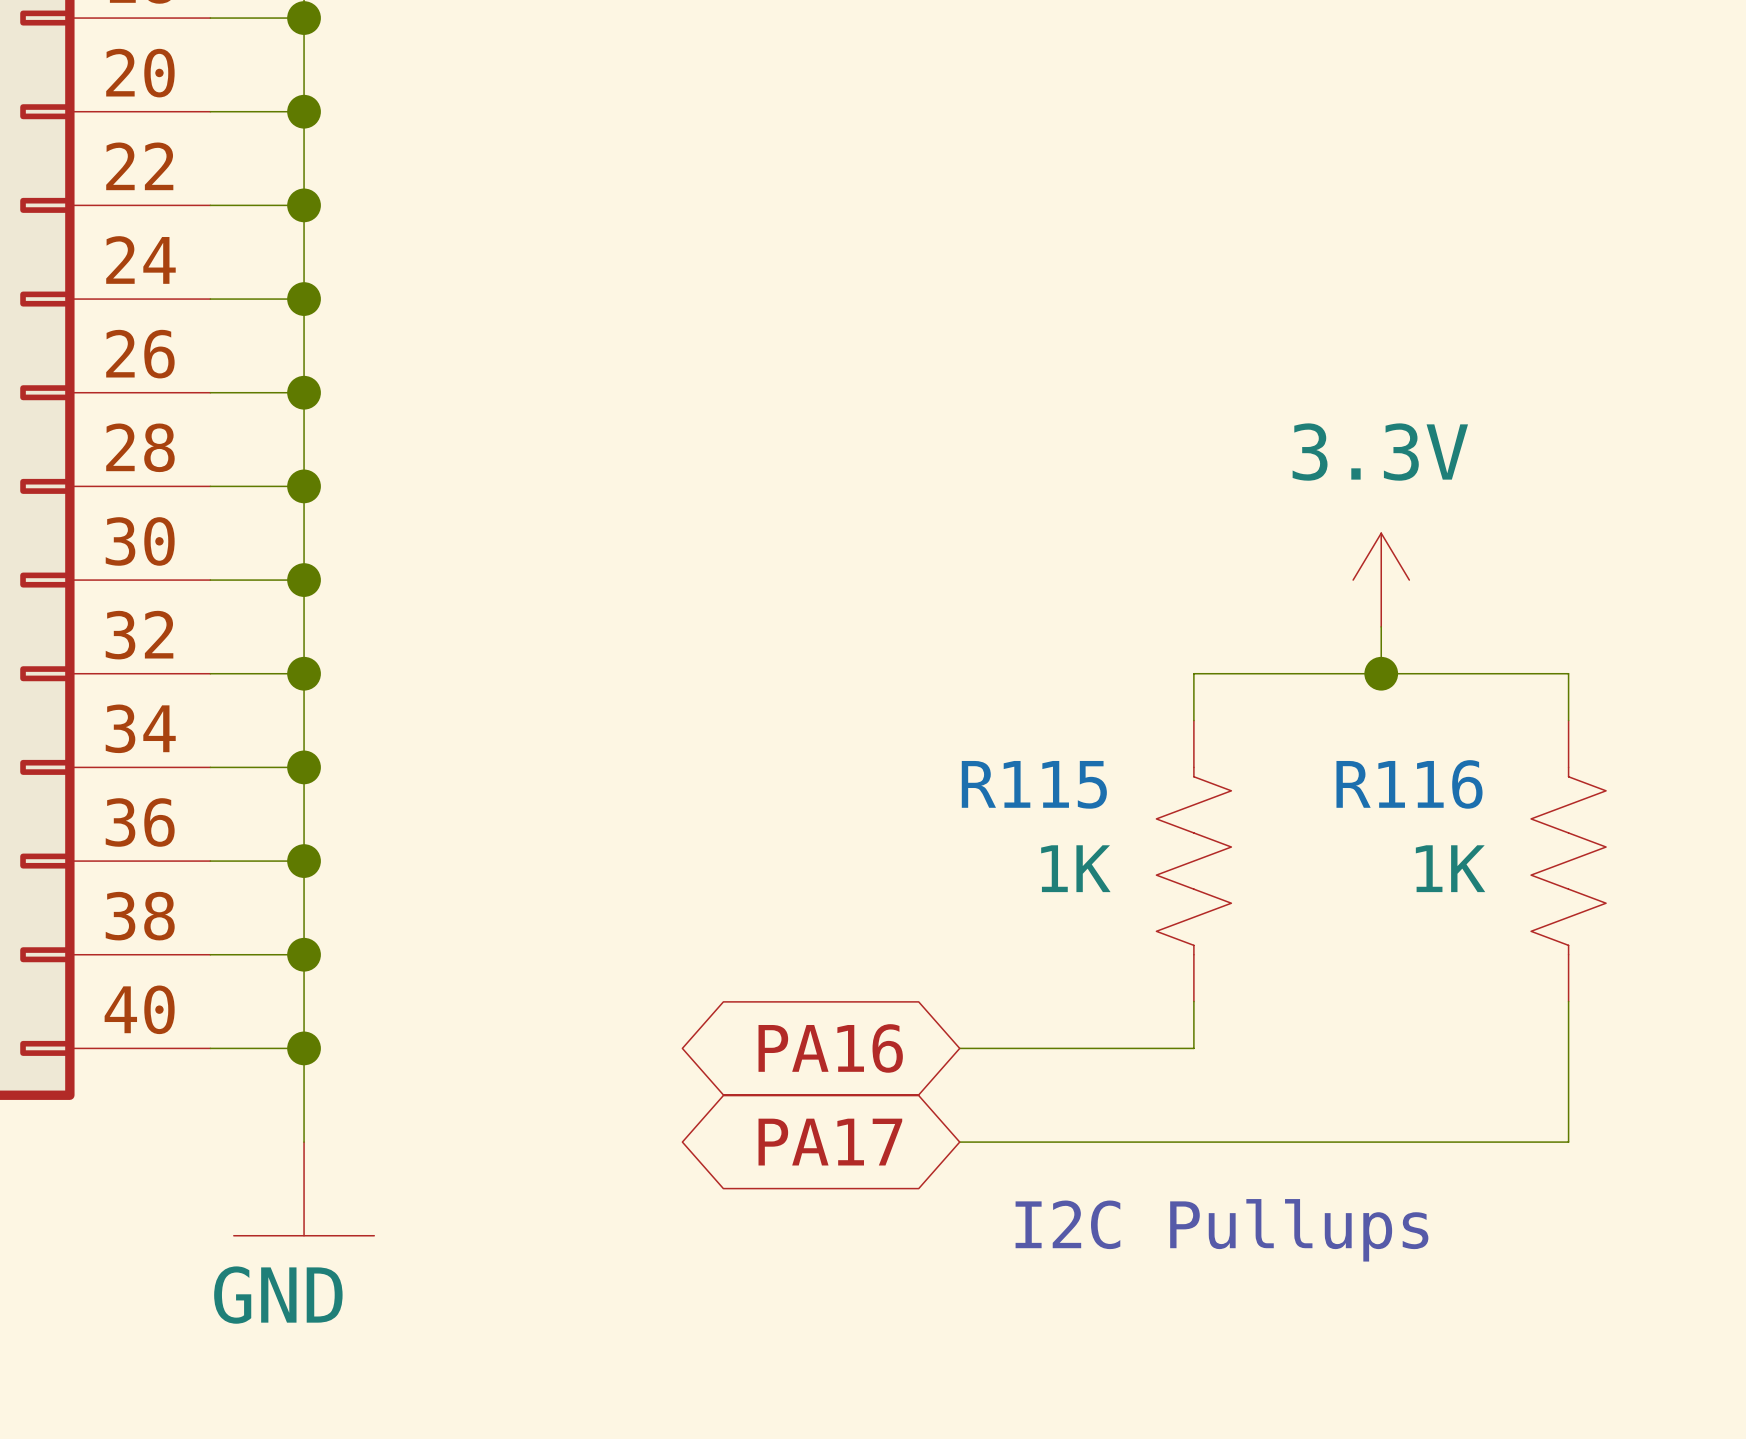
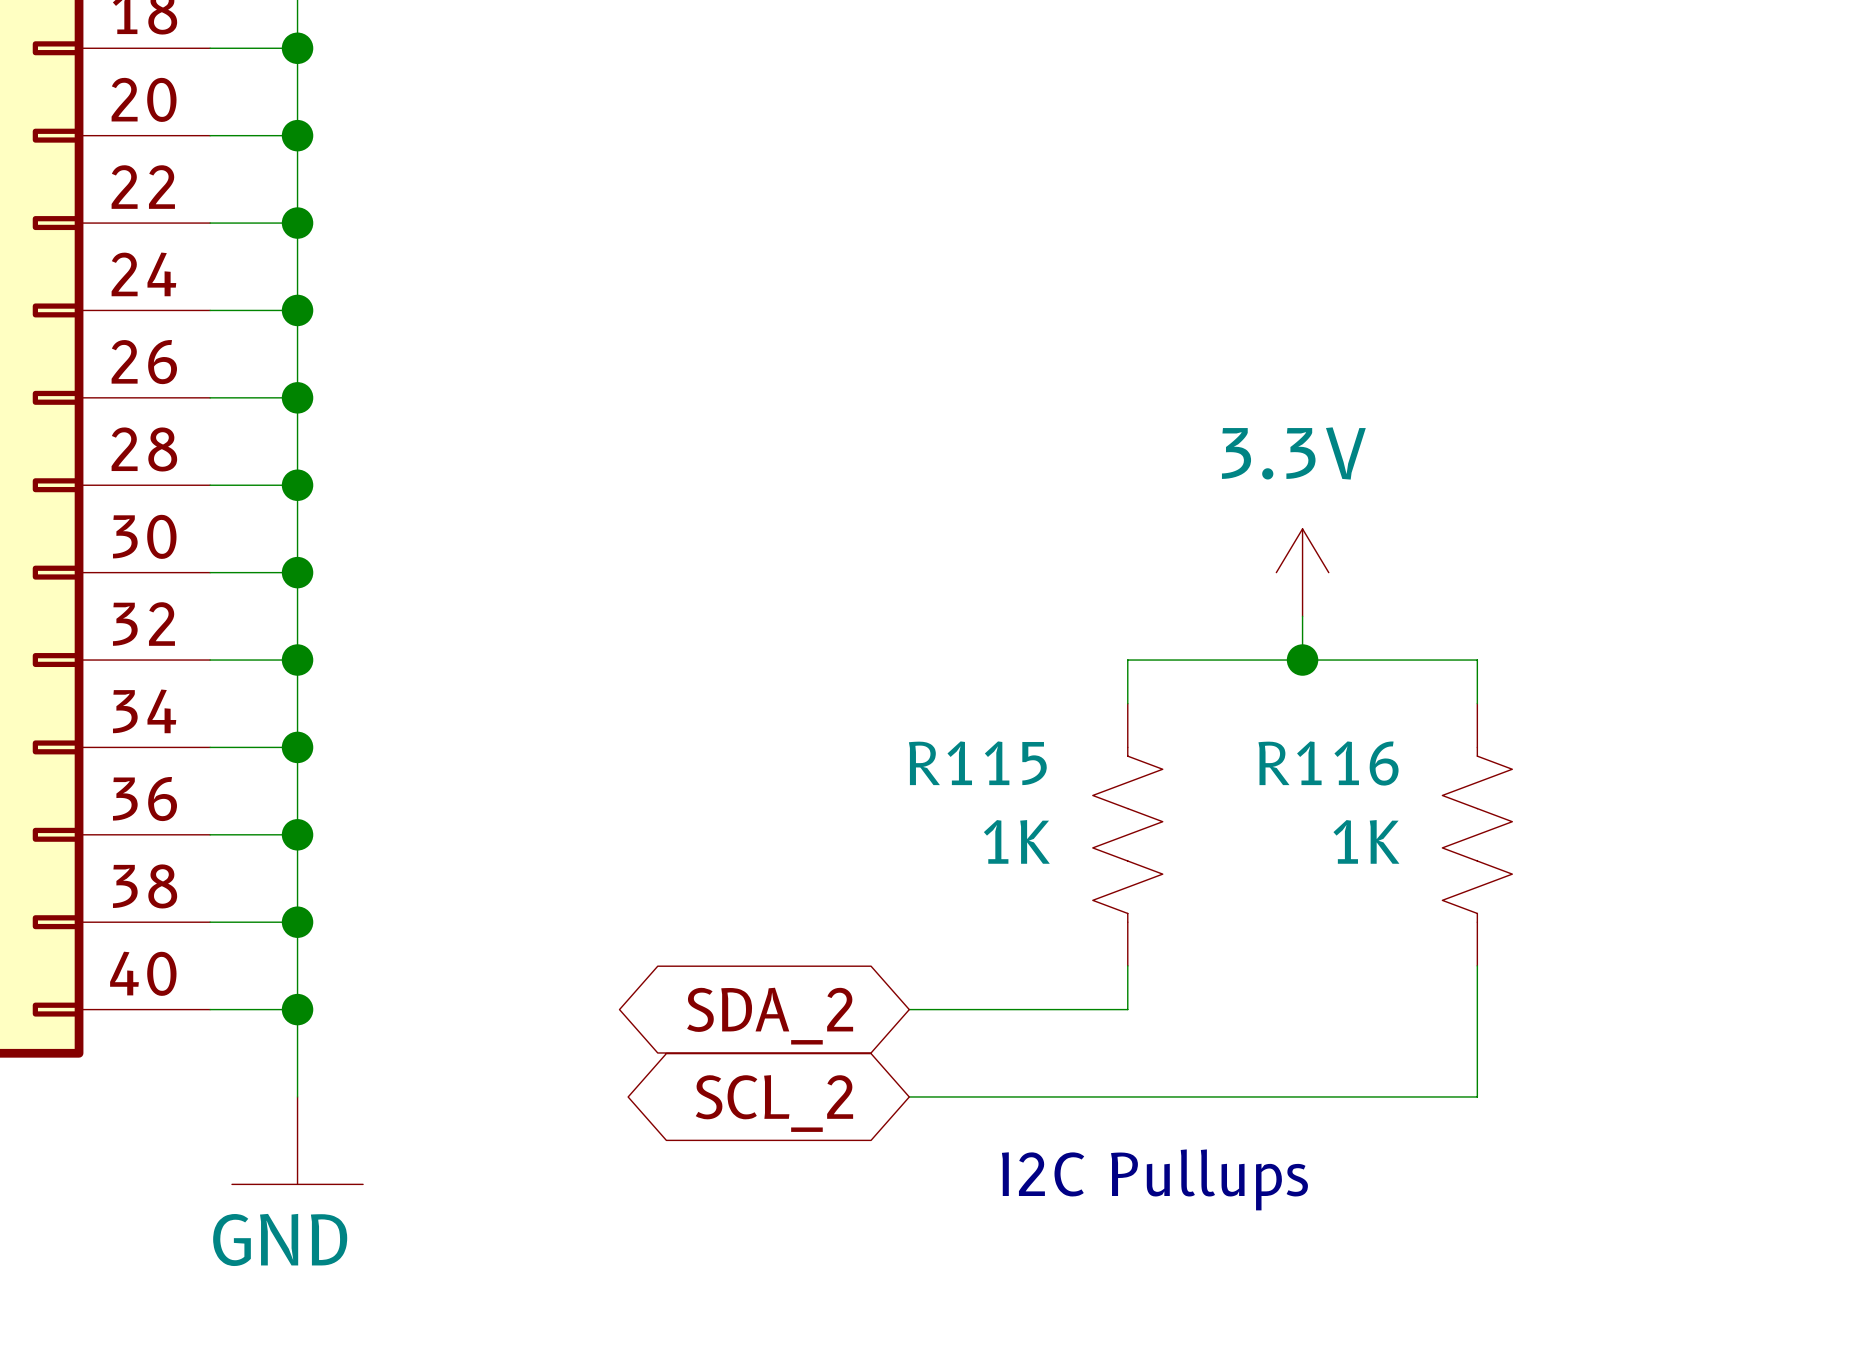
global label: PA16 (830, 1048) -> SDA_2 (770, 1016)
global label: PA17 (830, 1142) -> SCL_2 (774, 1103)

